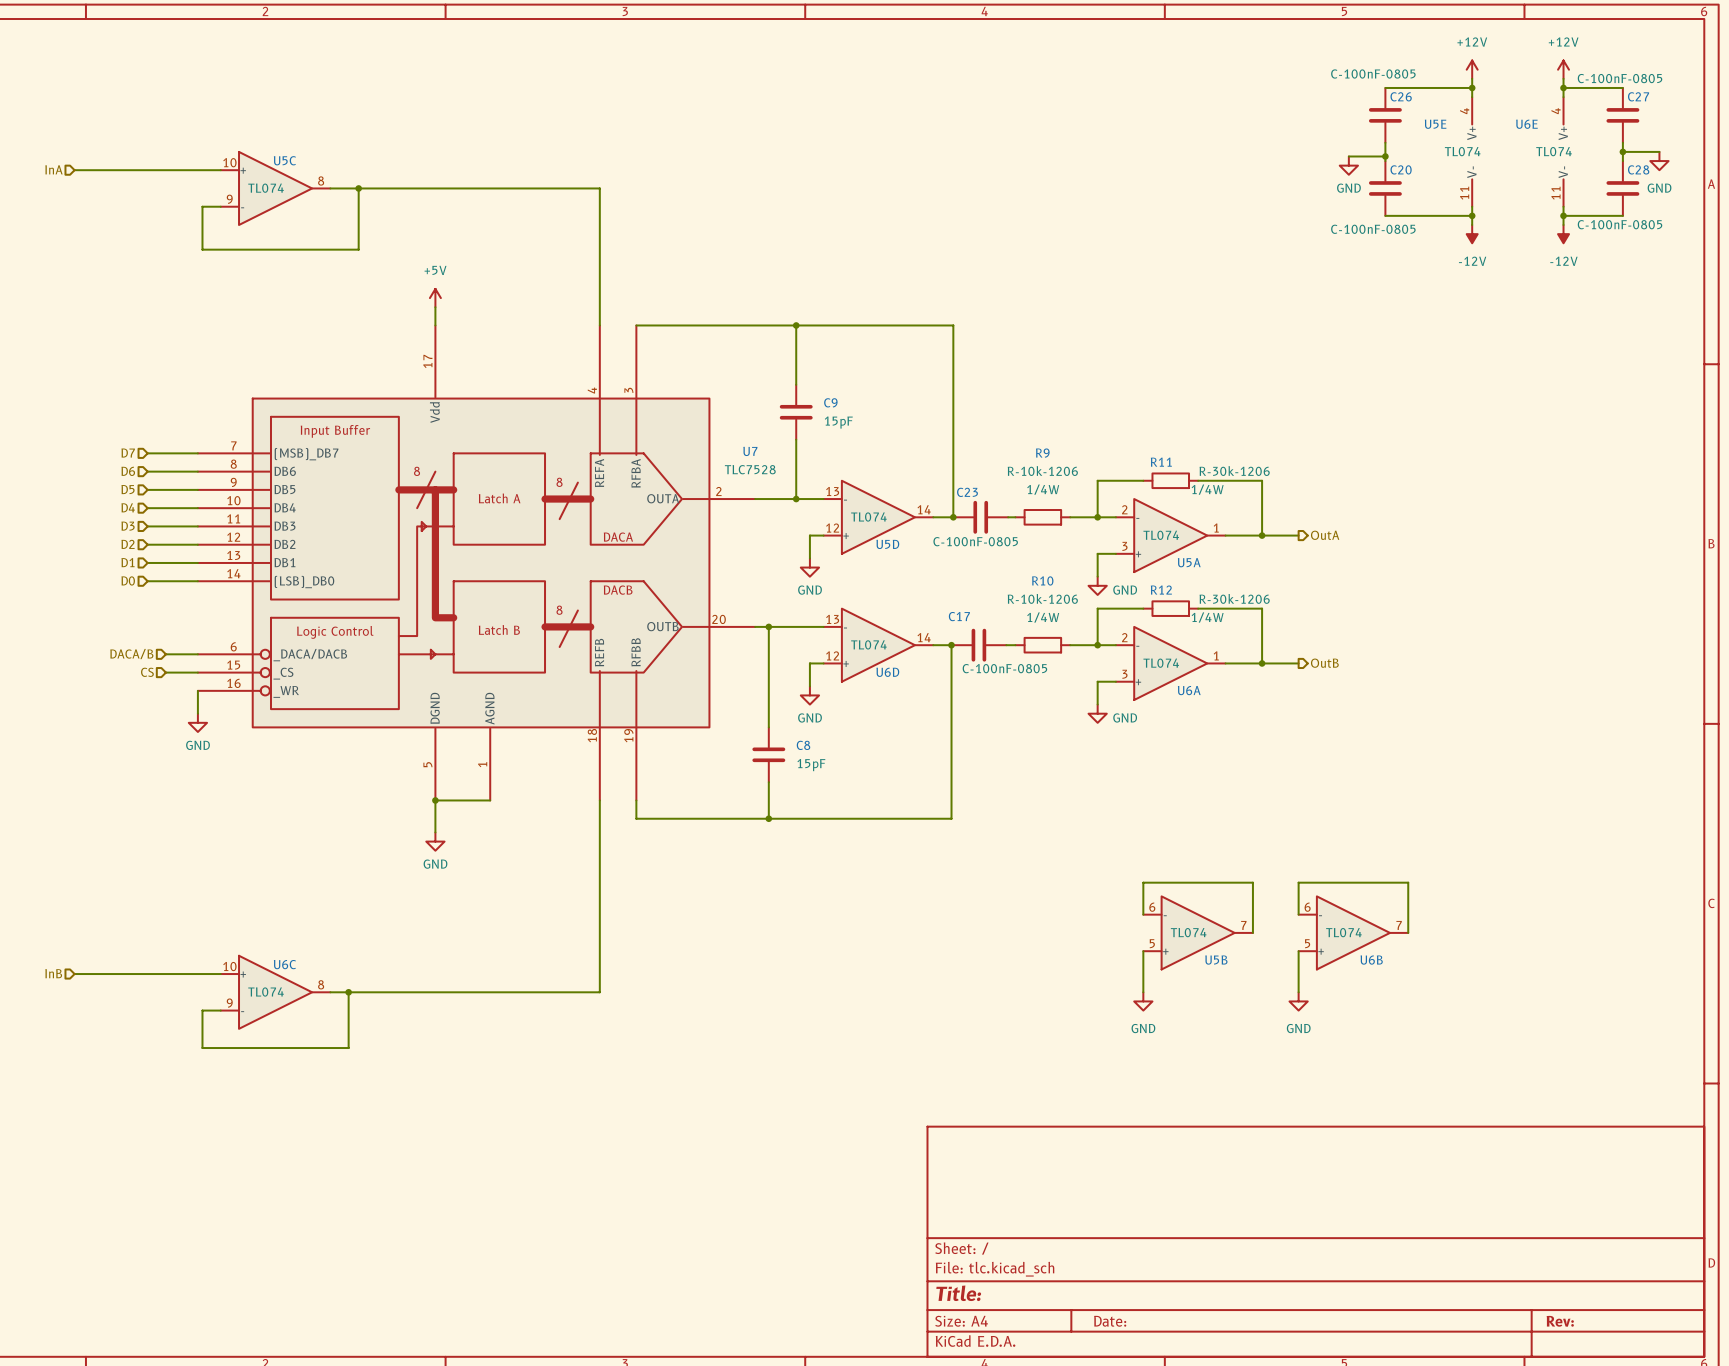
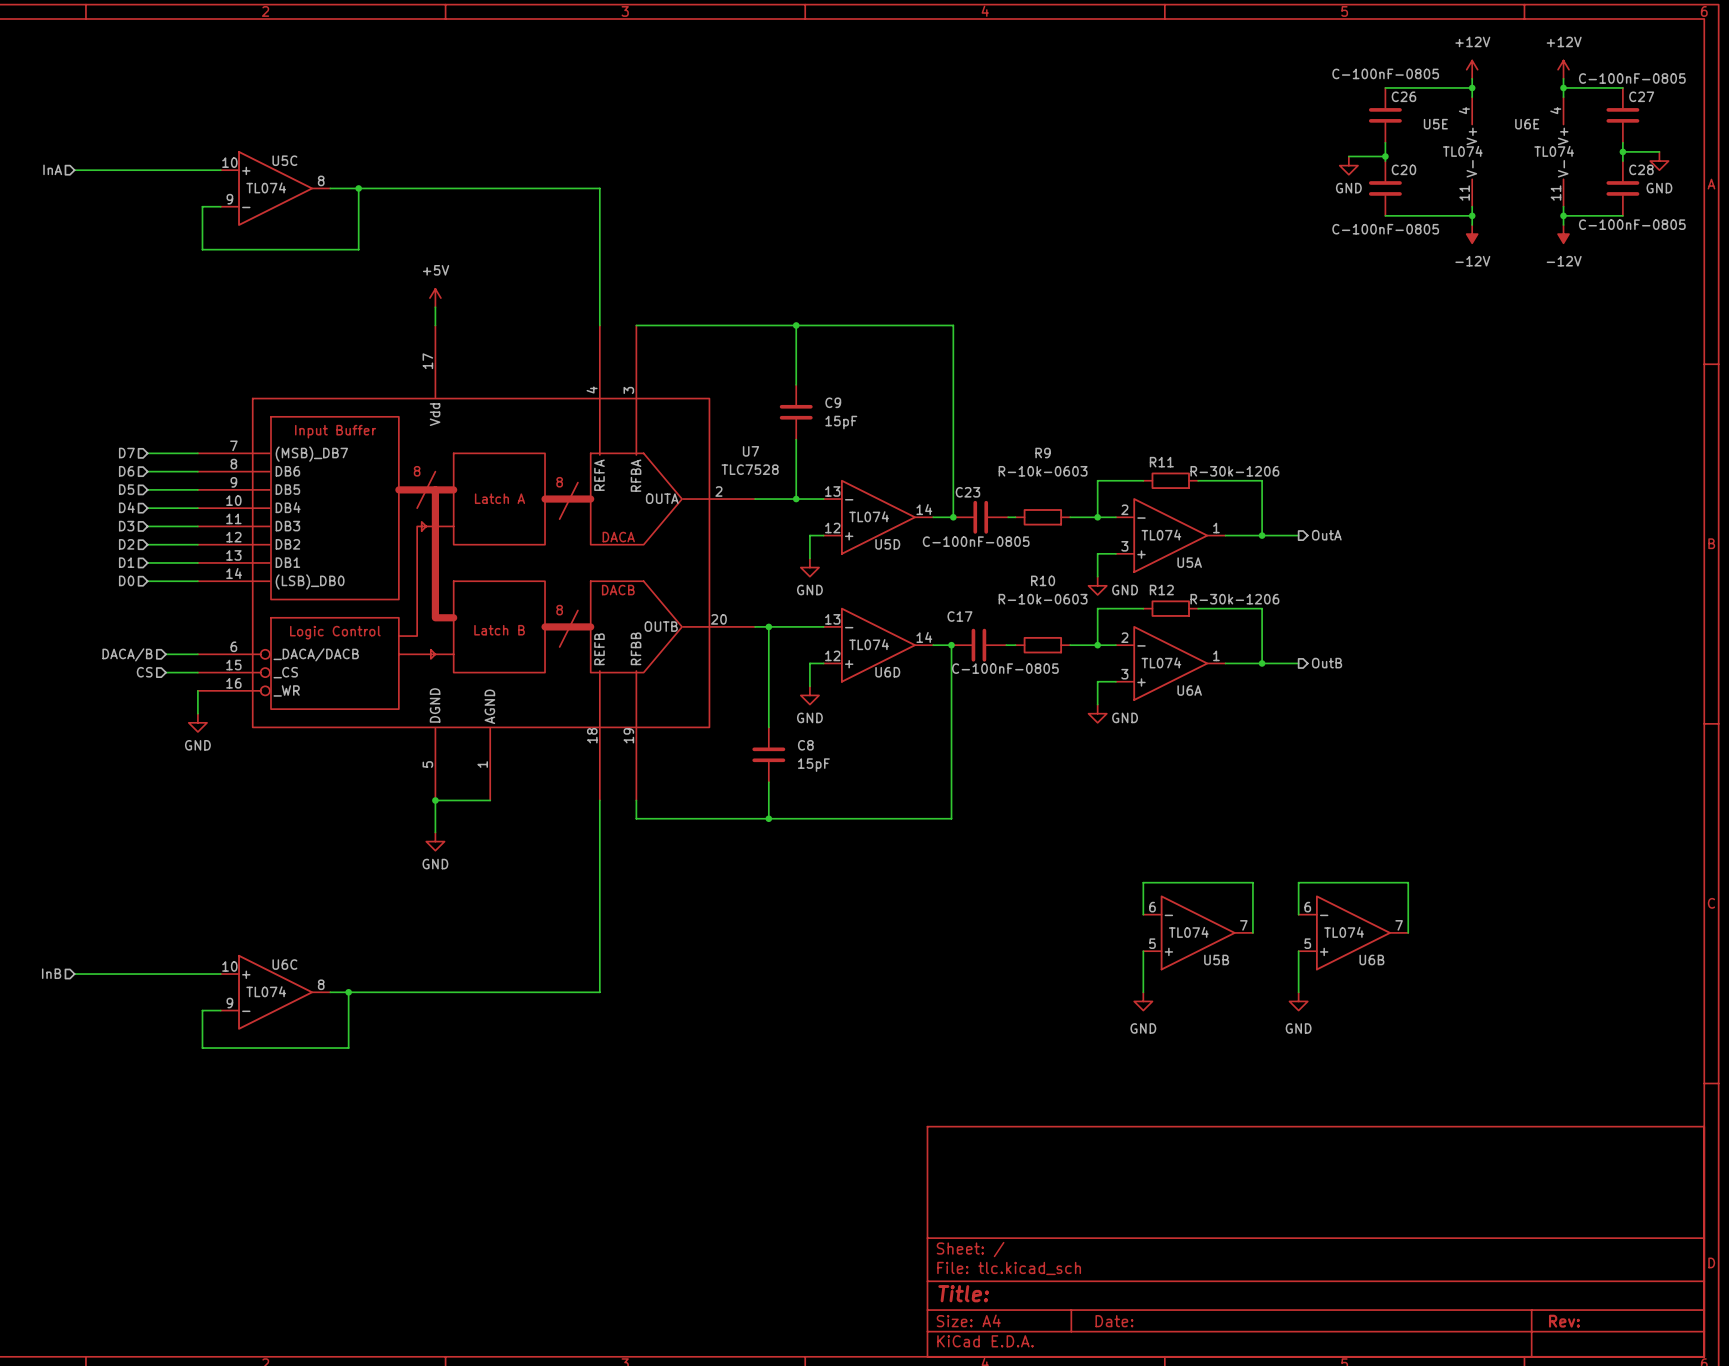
R9 value: R-10k-1206 (1042, 471) -> R-10k-0603 (1043, 471)
R9 text: 1/4W (1043, 489) -> none
R11 text: 1/4W (1207, 489) -> none
R10 value: R-10k-1206 (1042, 598) -> R-10k-0603 (1043, 599)
R10 text: 1/4W (1043, 617) -> none
R12 text: 1/4W (1207, 617) -> none

